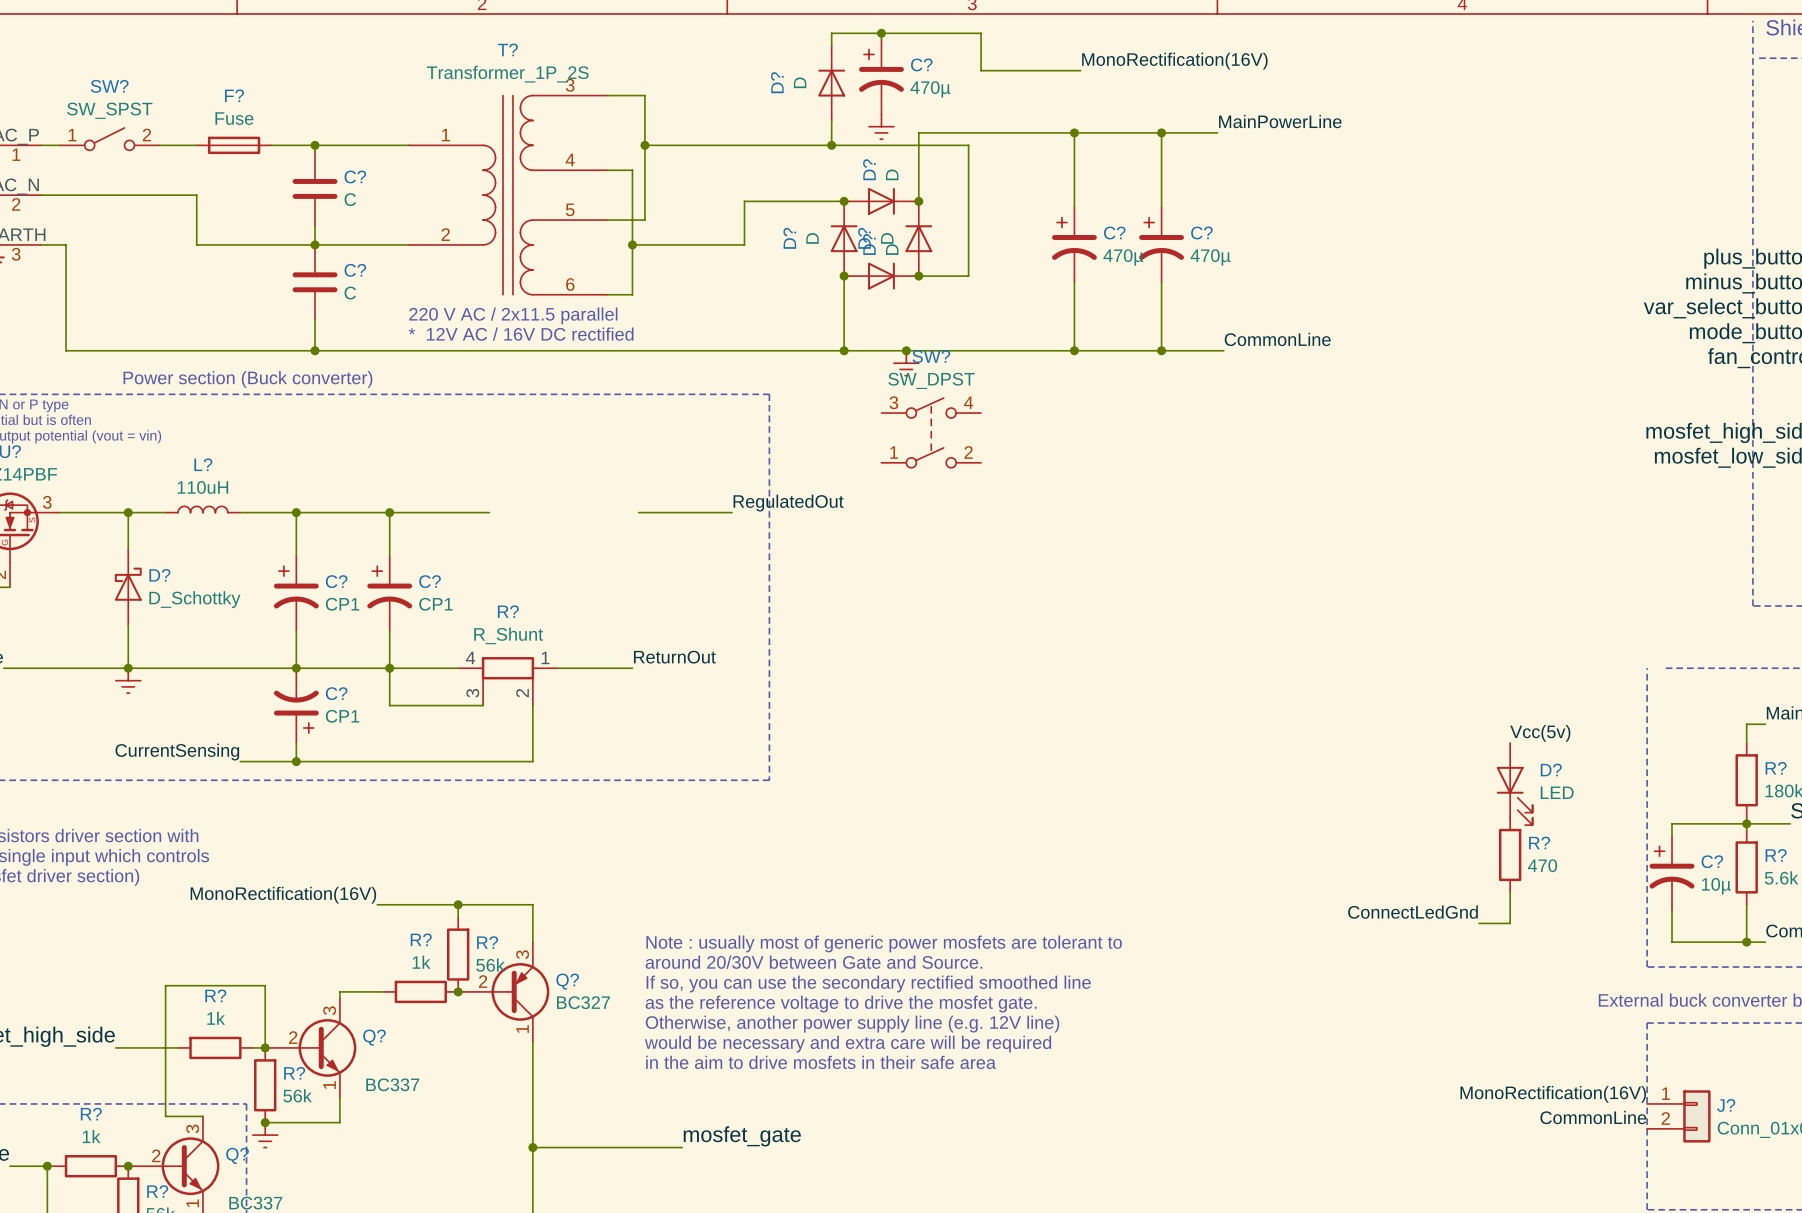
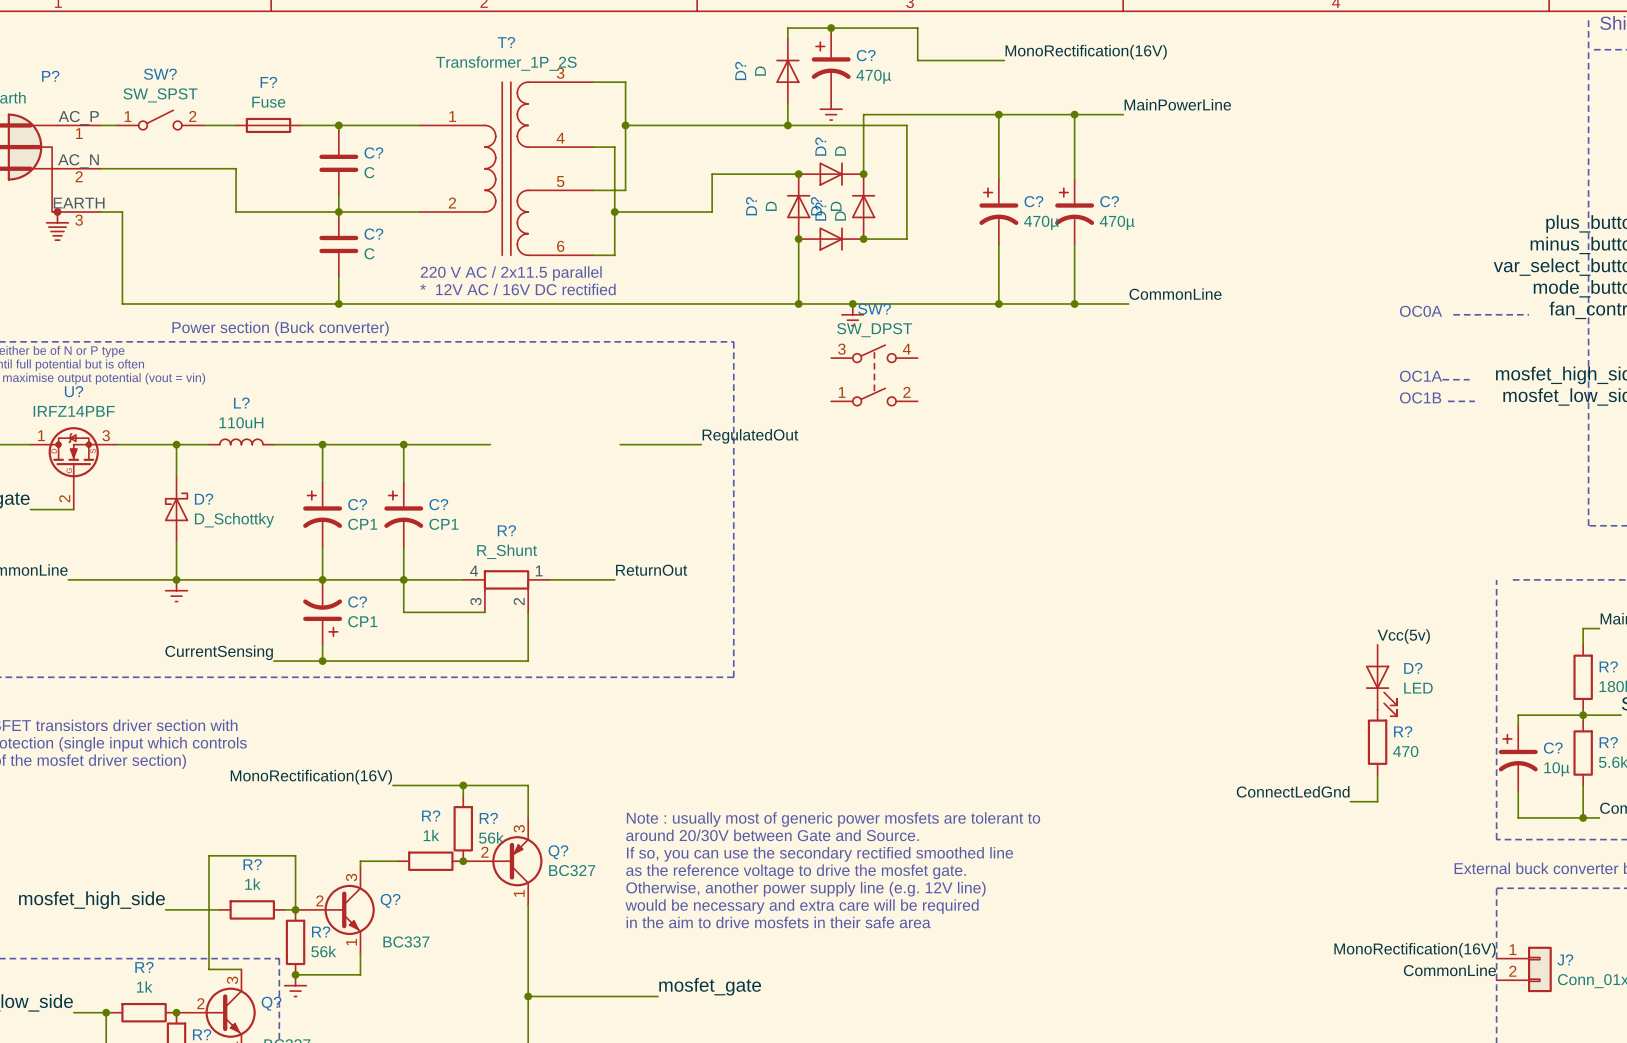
text: none -> OC0A (1420, 311)
line: none -> (1453, 314) (1529, 314)
text: none -> OC1A (1420, 376)
line: none -> (1442, 379) (1469, 379)
text: none -> OC1B (1420, 397)
line: none -> (1447, 401) (1474, 401)

